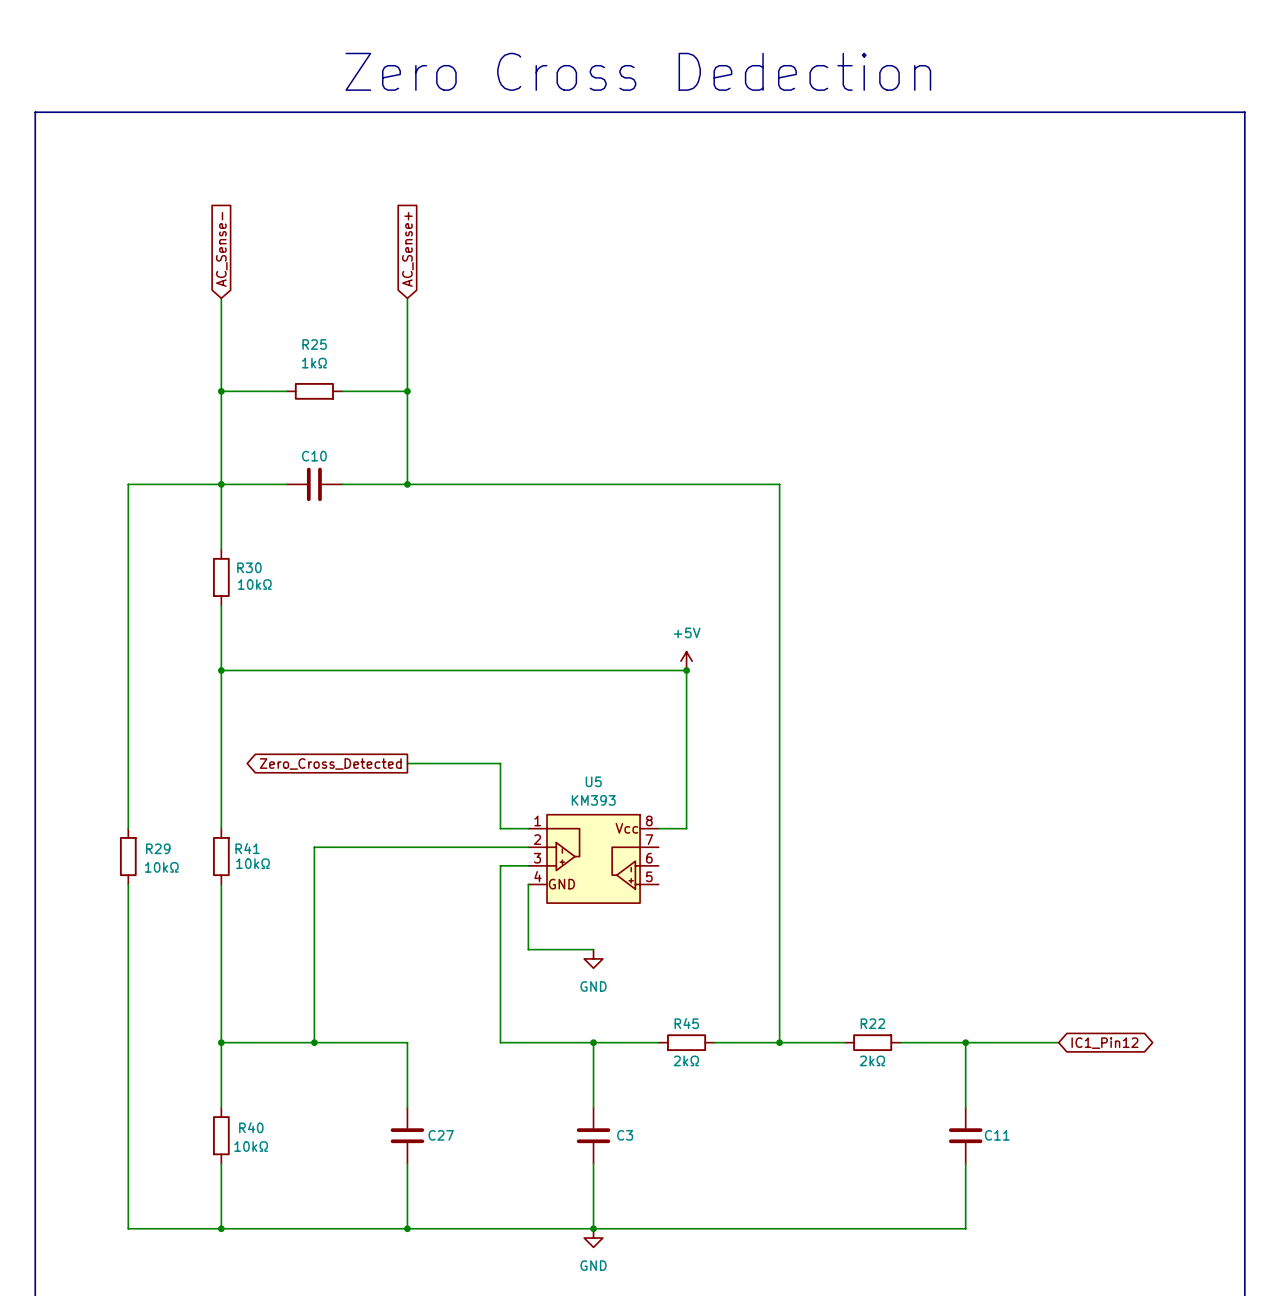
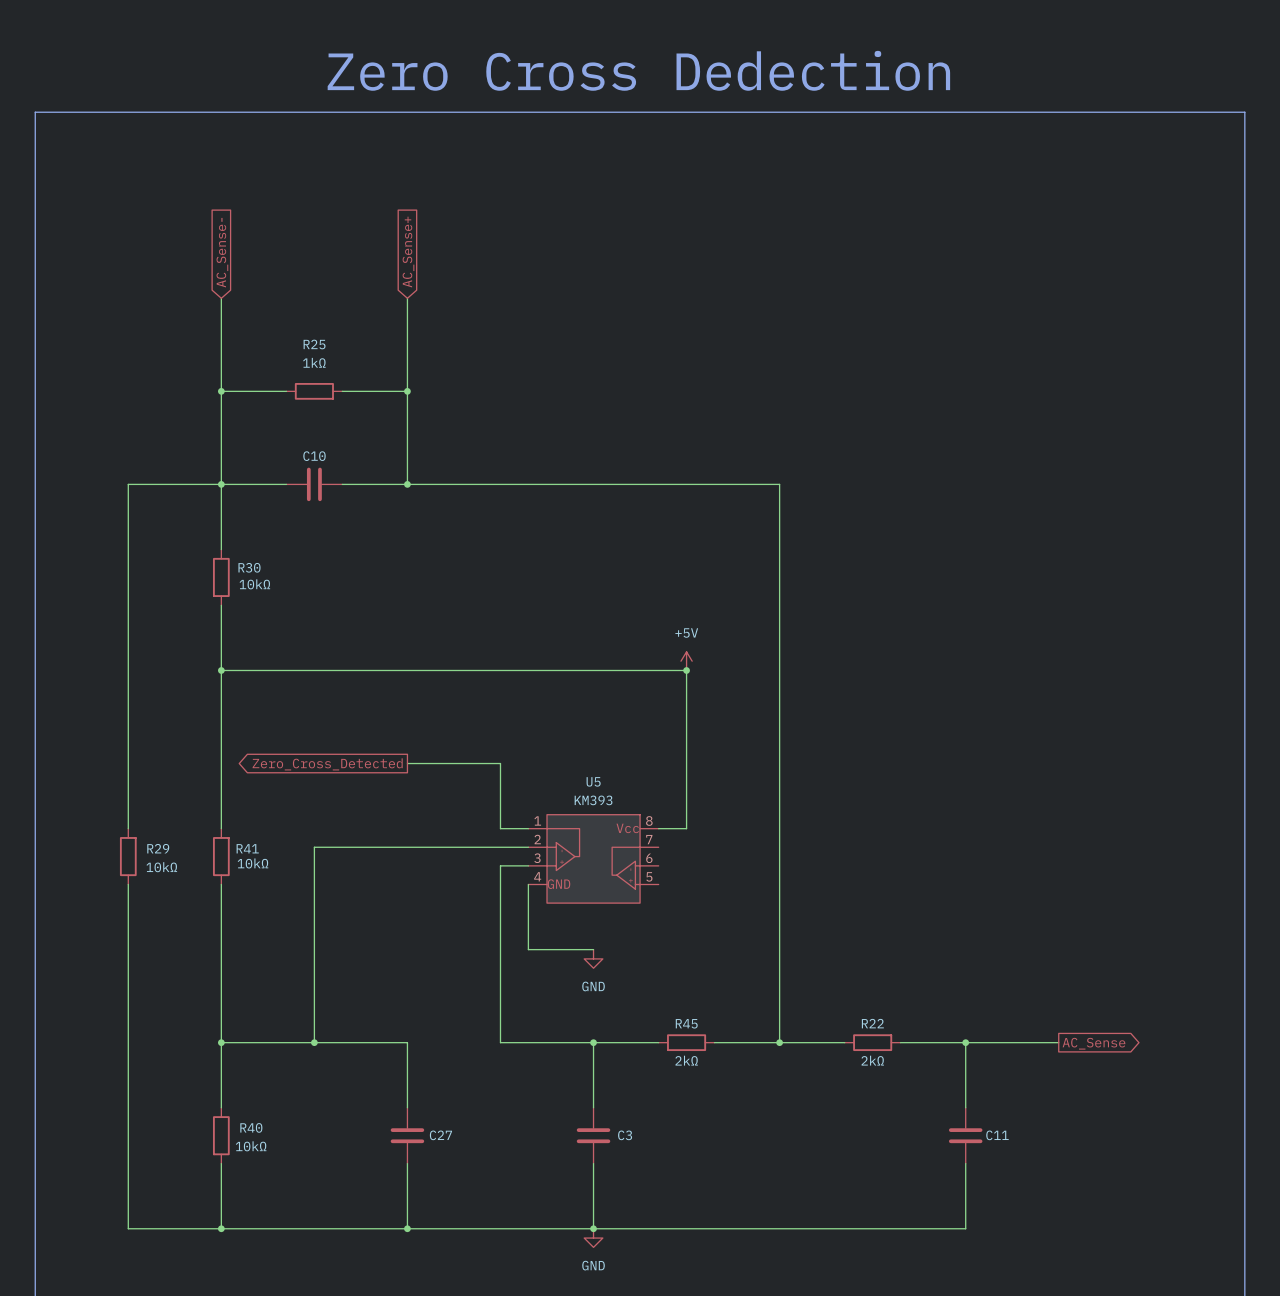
global label shape: bidirectional (1104, 1043) -> output (1093, 1043)
global label: IC1_Pin12 (1104, 1043) -> AC_Sense (1093, 1043)

